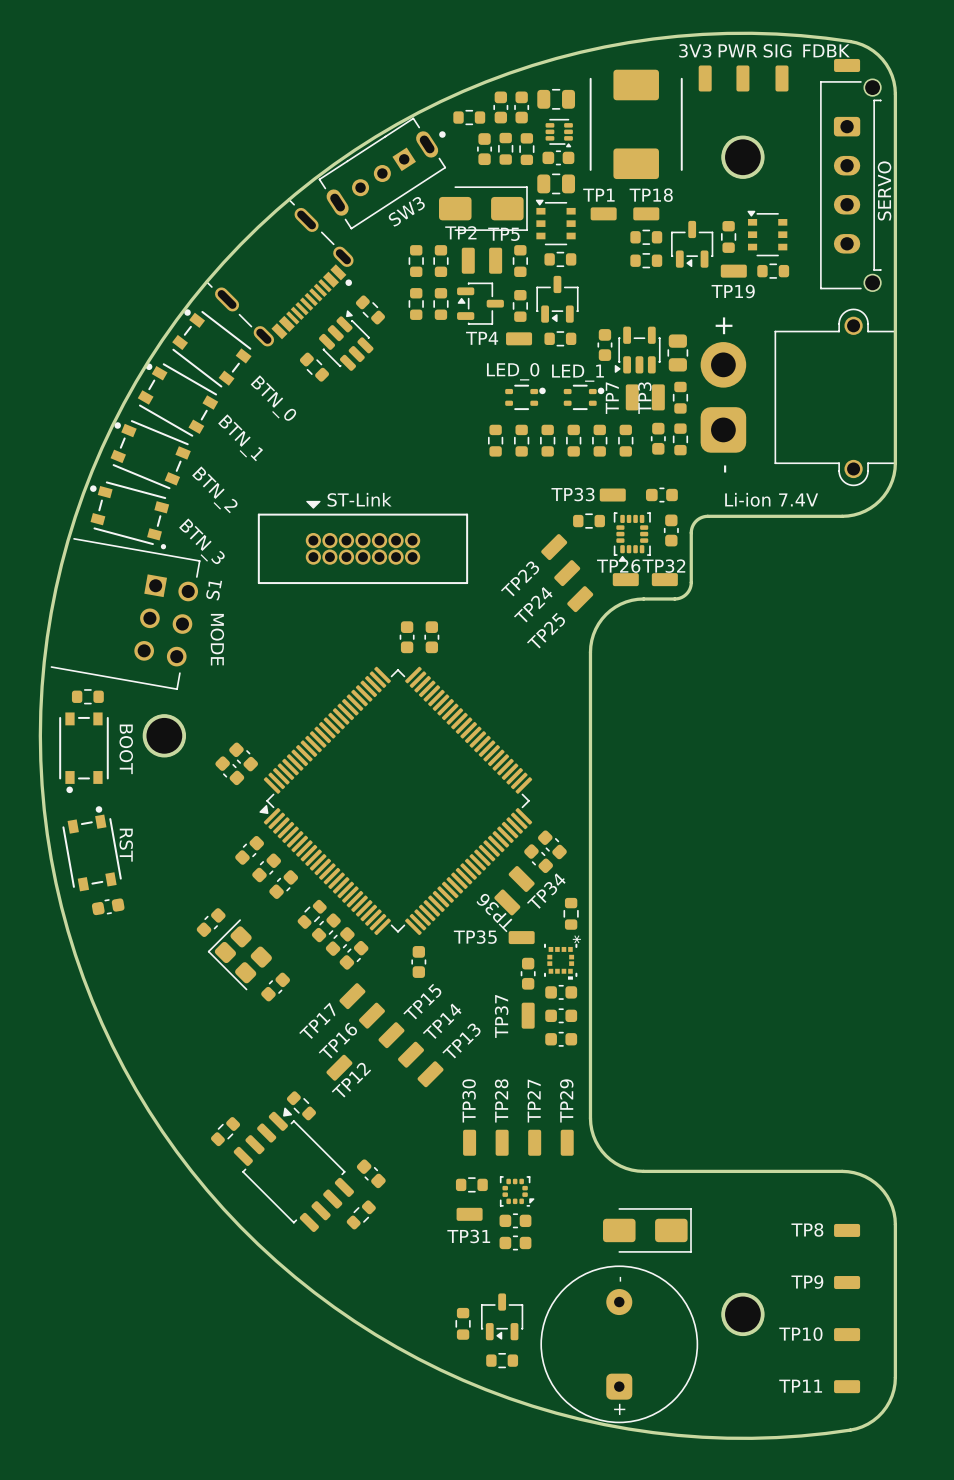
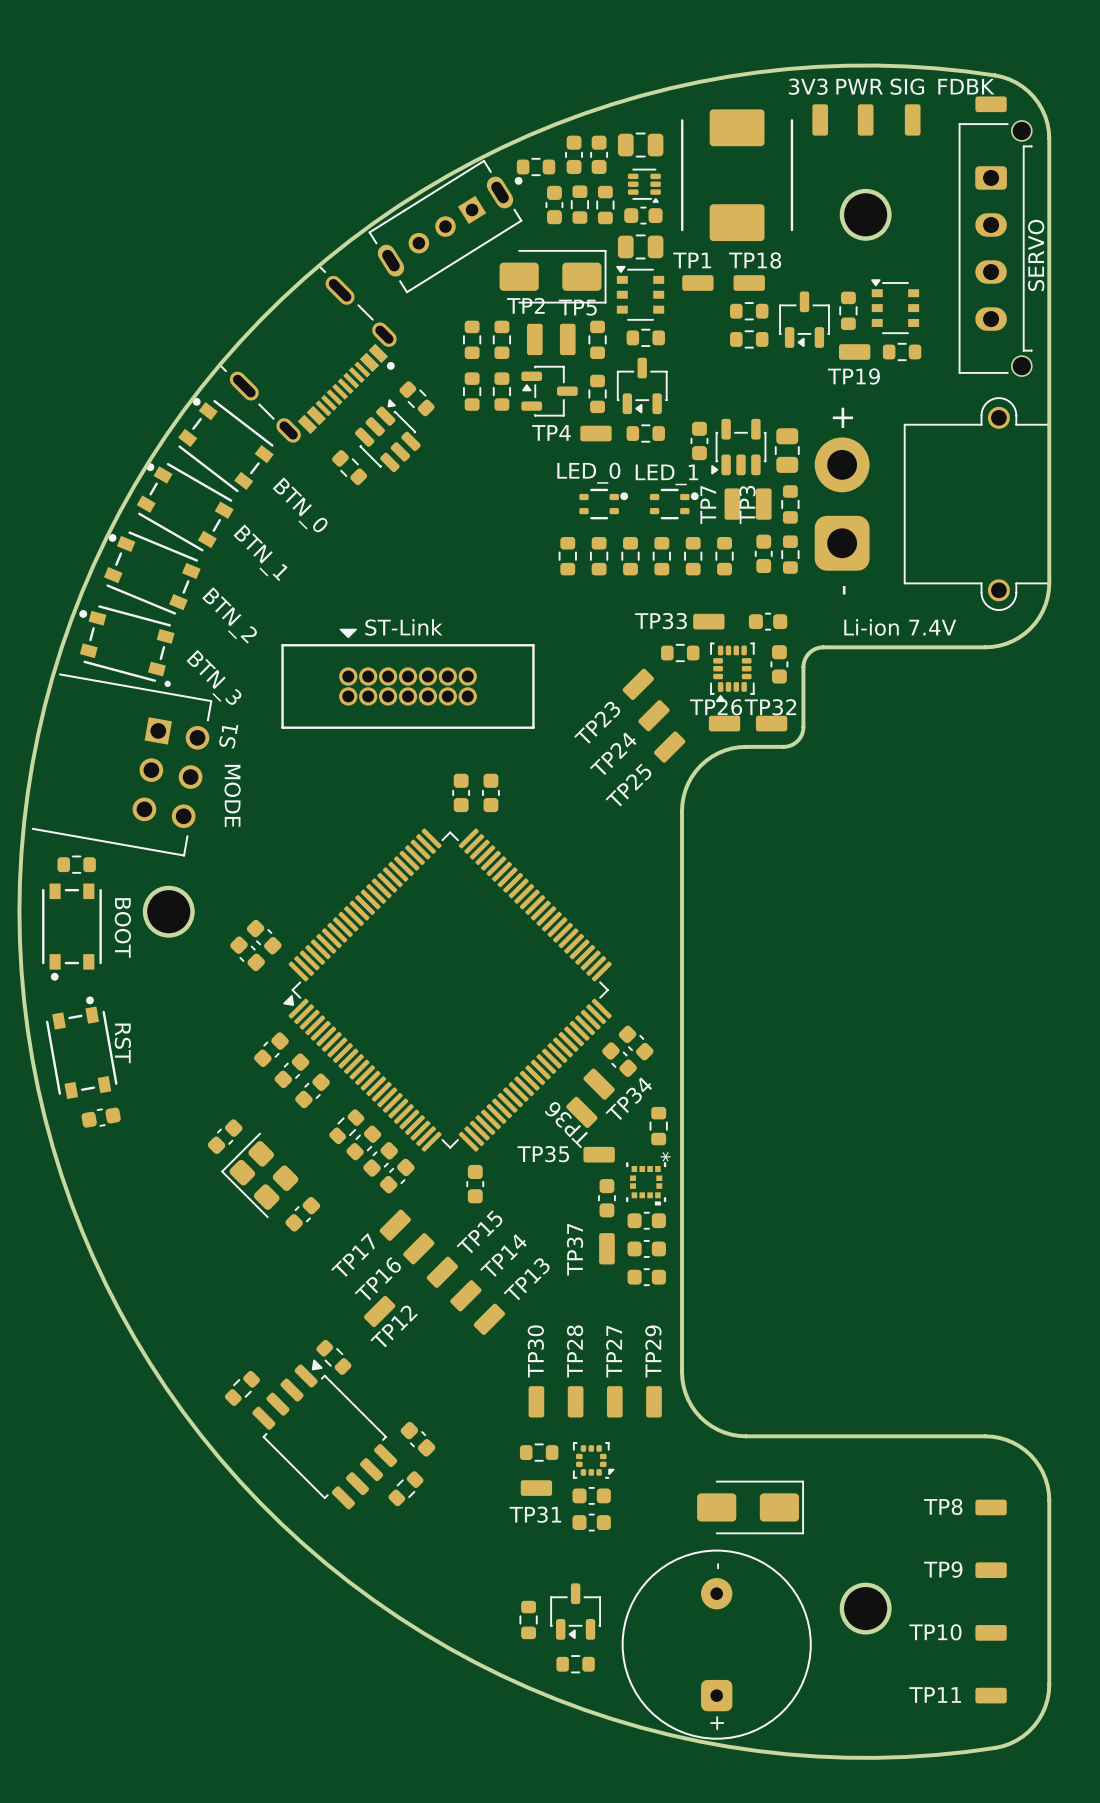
part: none -> (445, 226)
SW3: (382, 173) -> none

